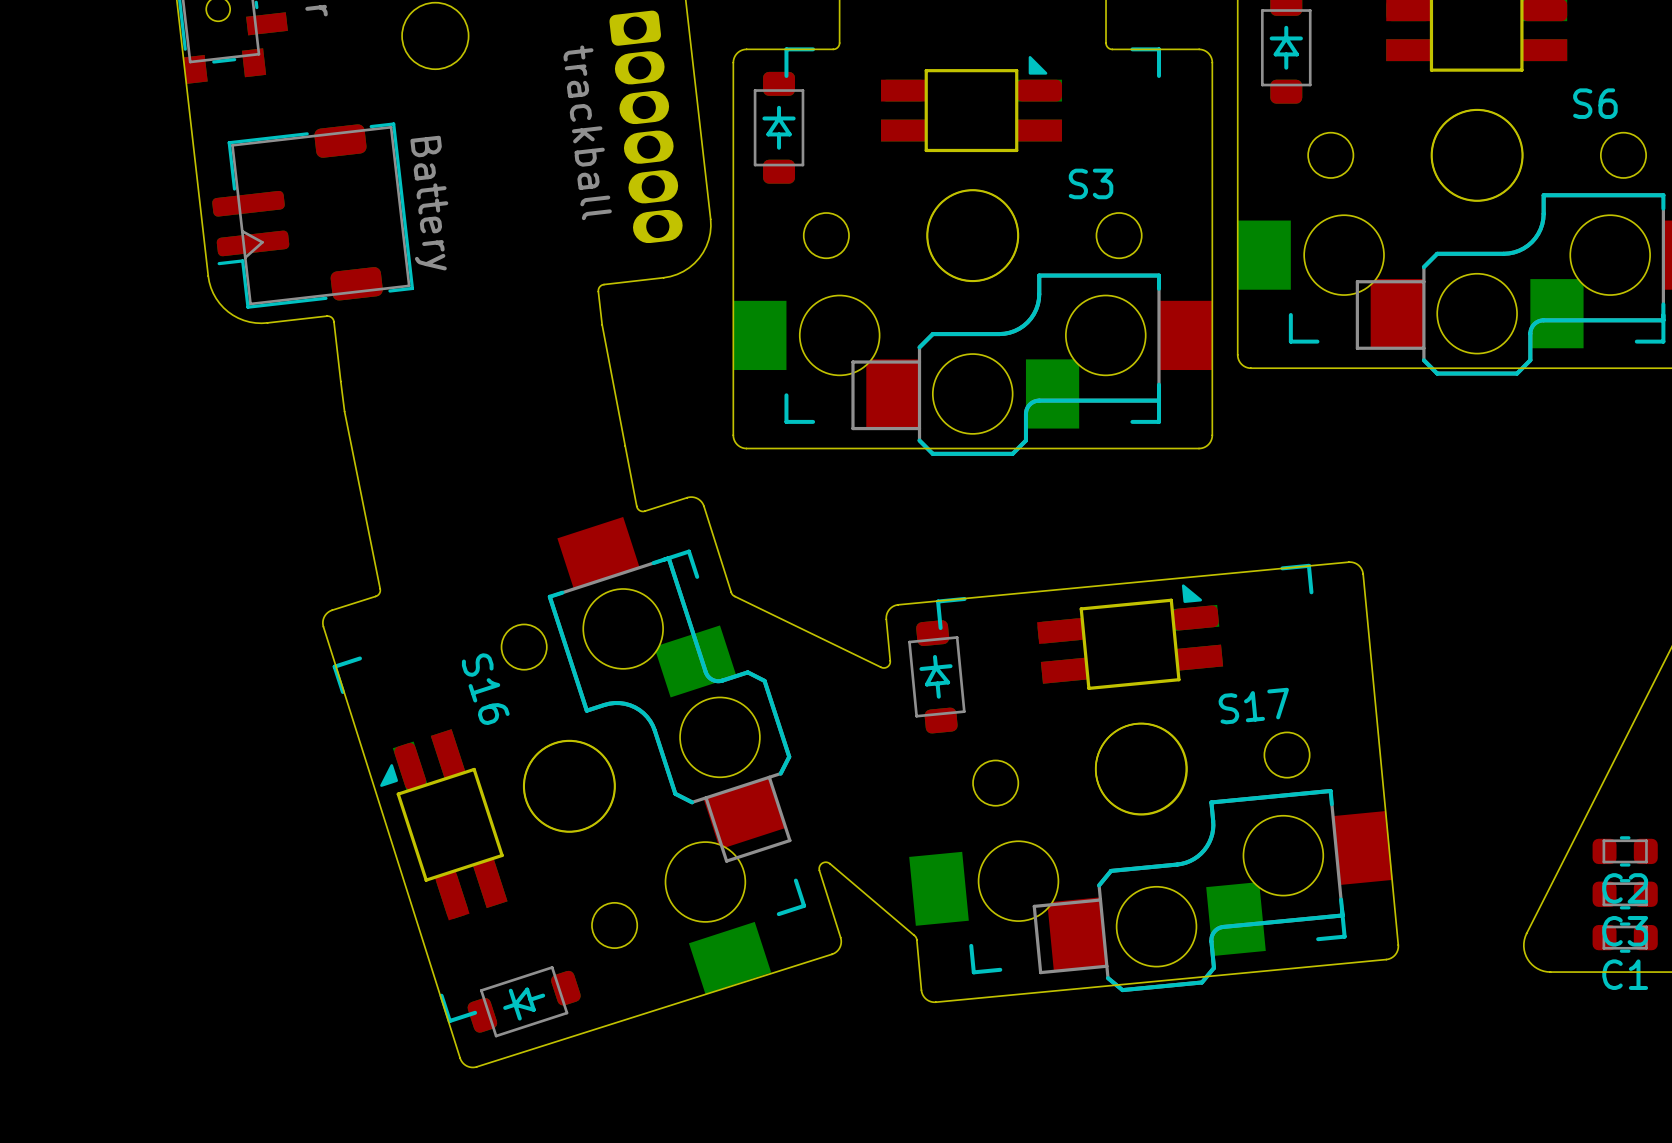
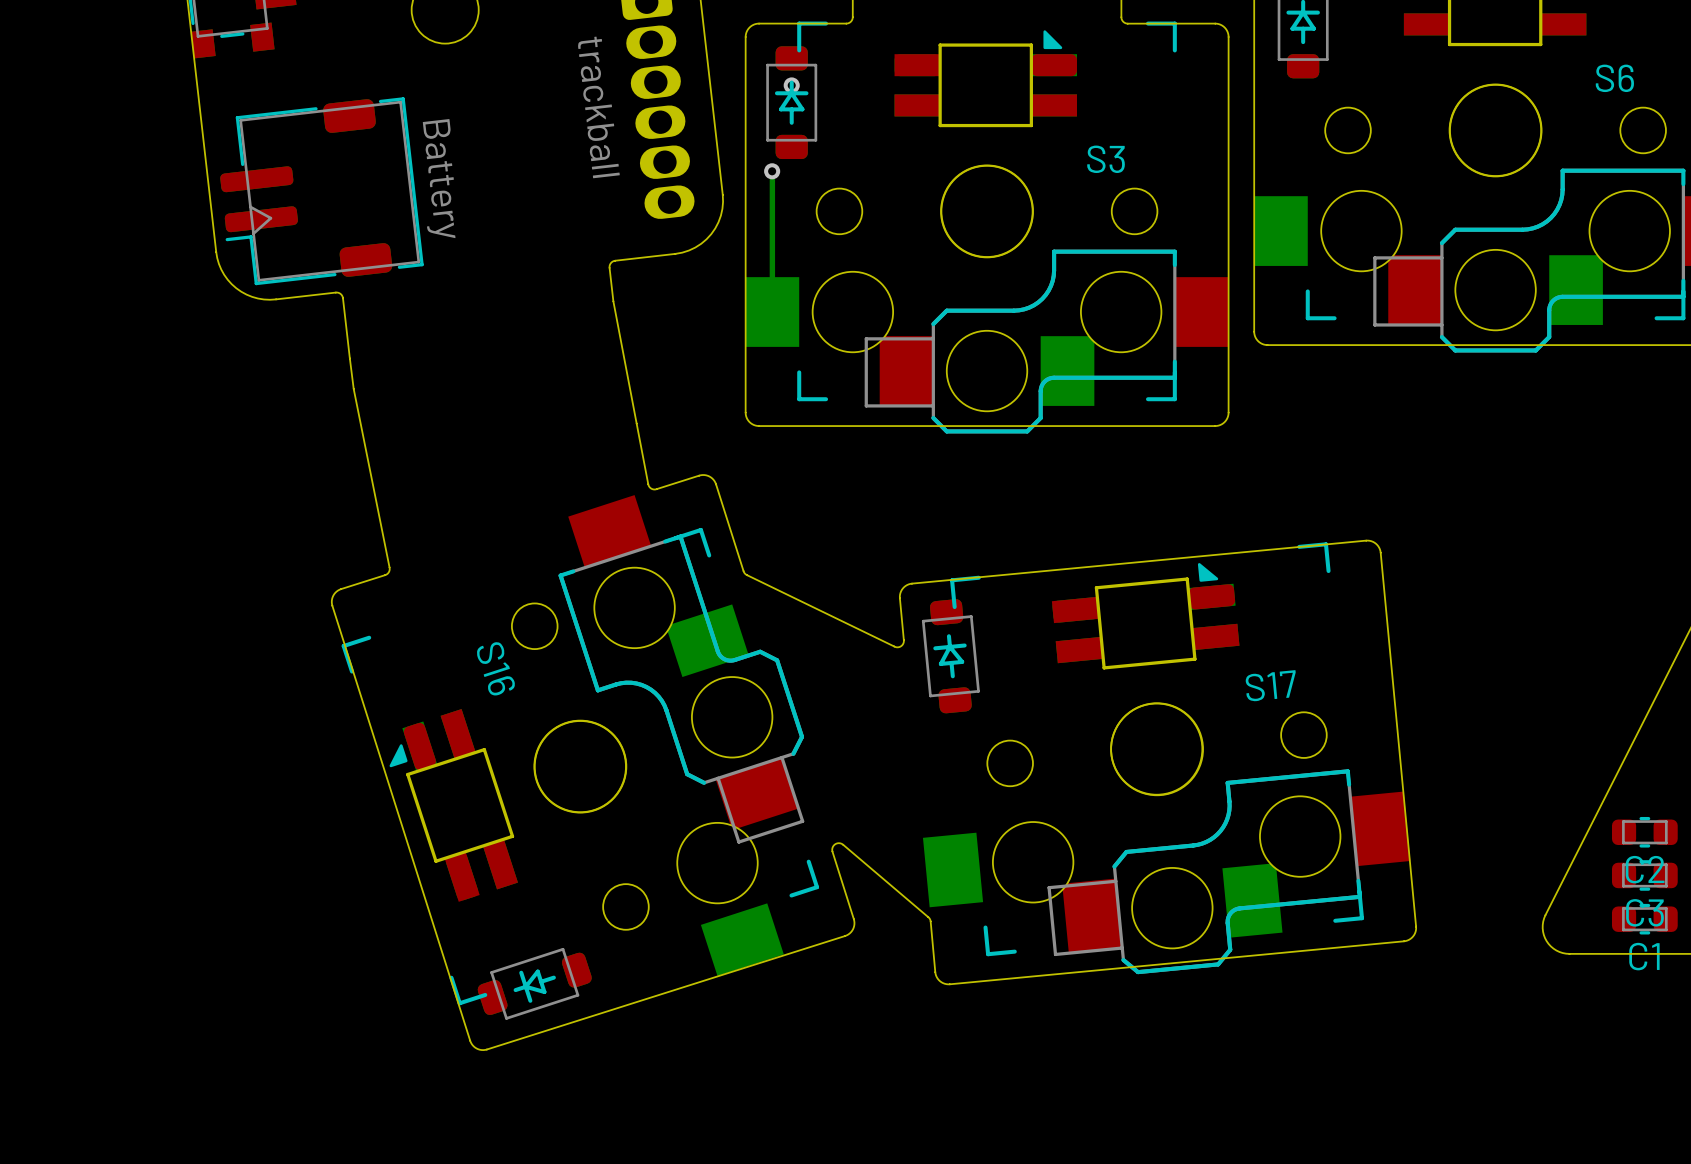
via: none -> (791, 85)
via: none -> (772, 171)
bottom track: none -> (772, 171) (772, 312)

